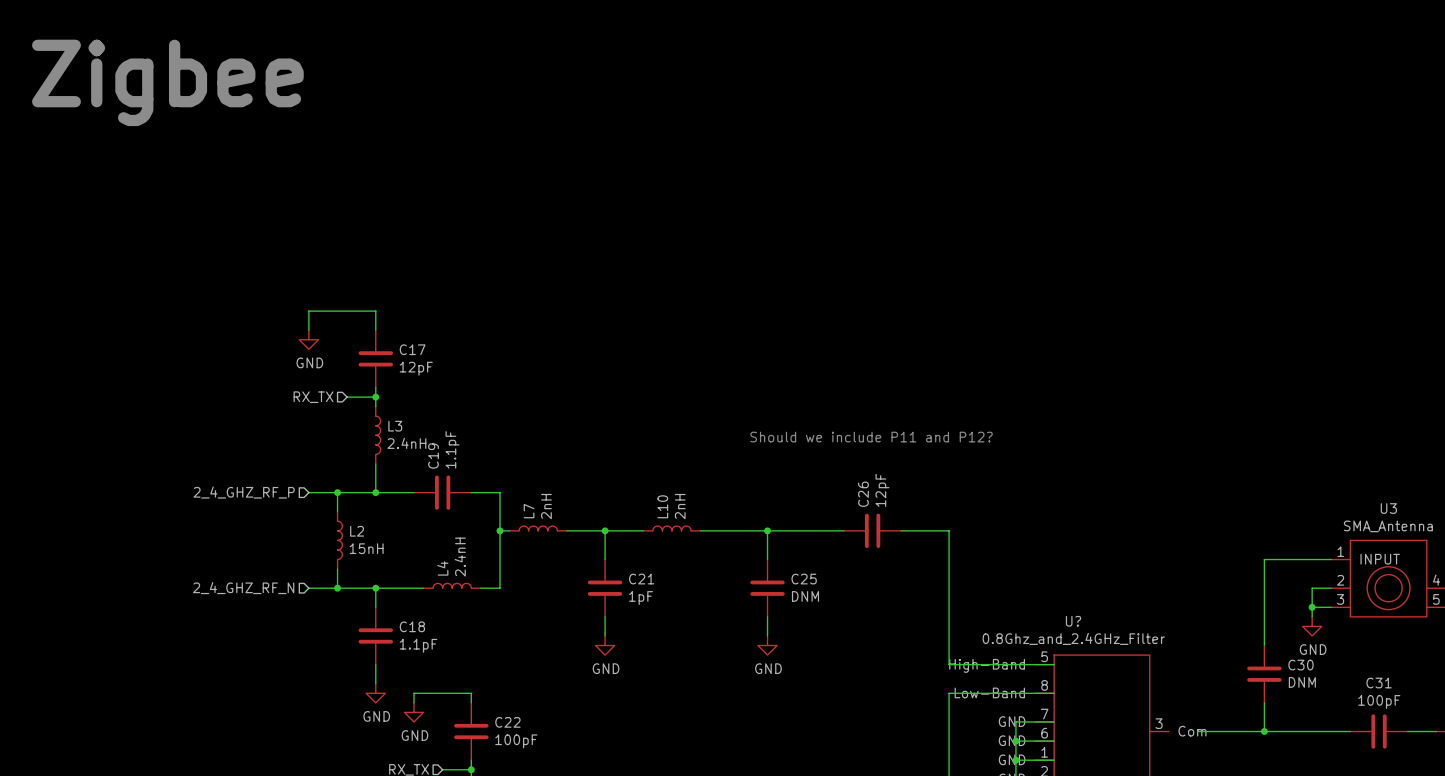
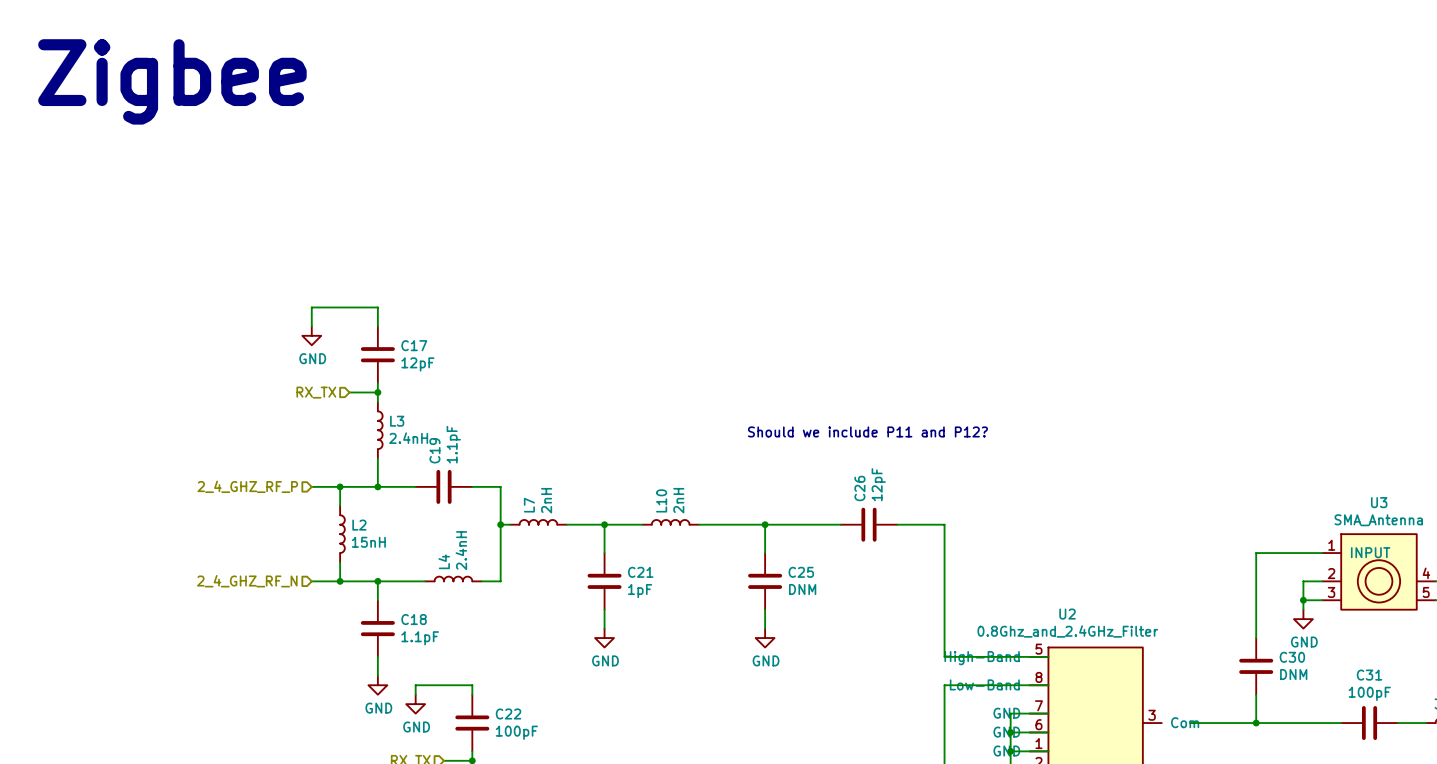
U? name: U? (1073, 621) -> U2 (1067, 614)

